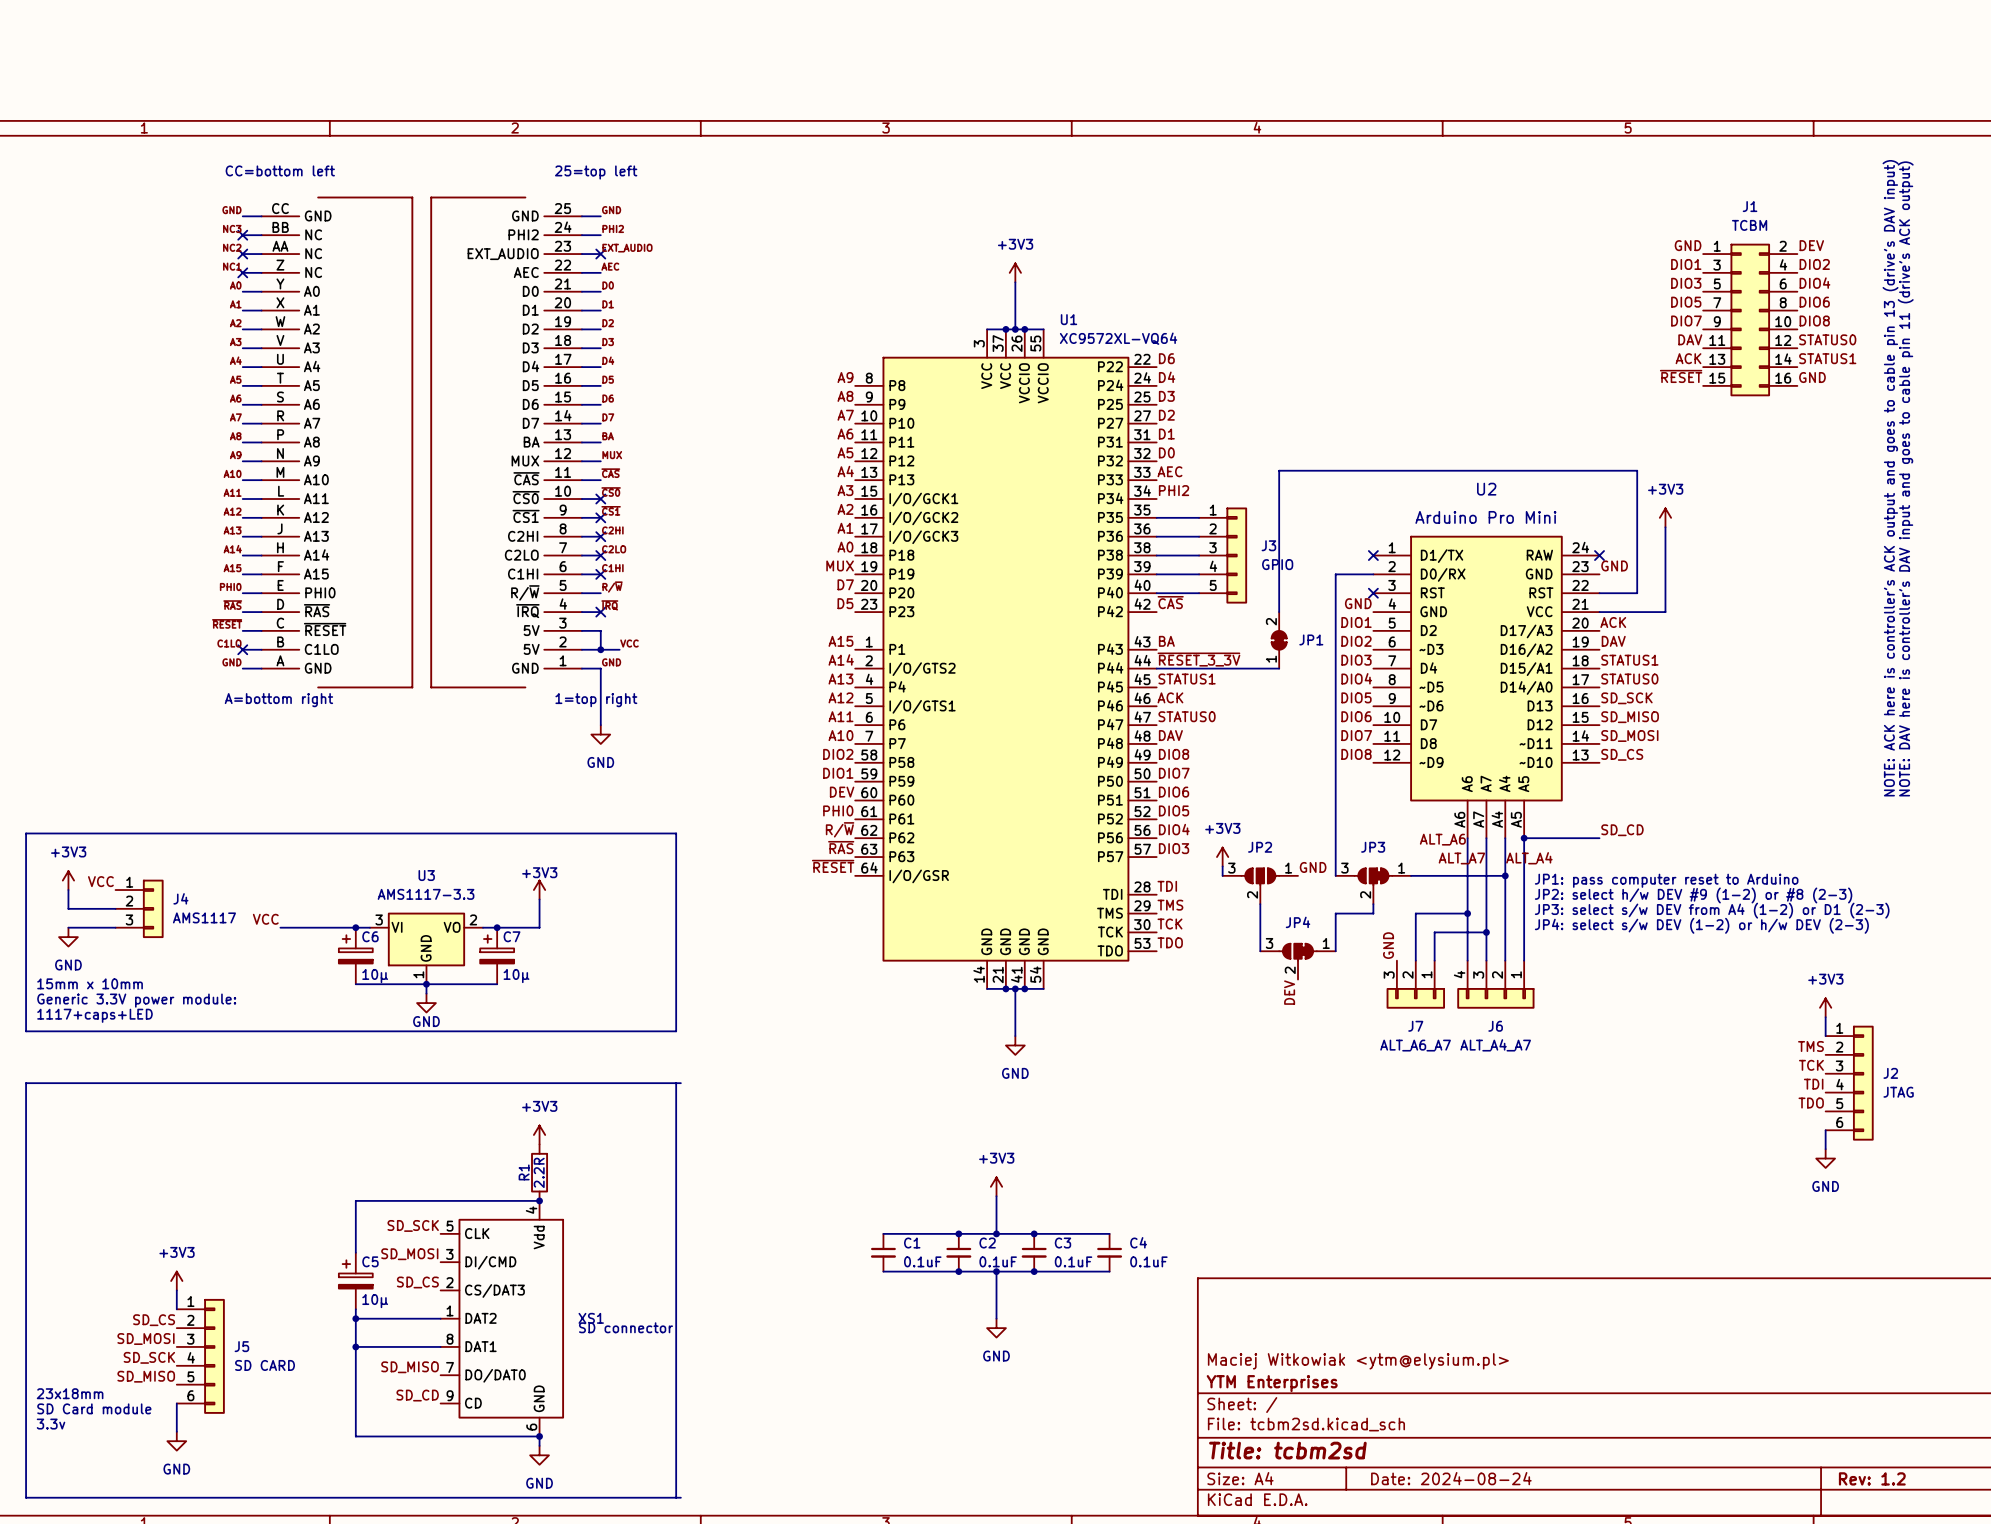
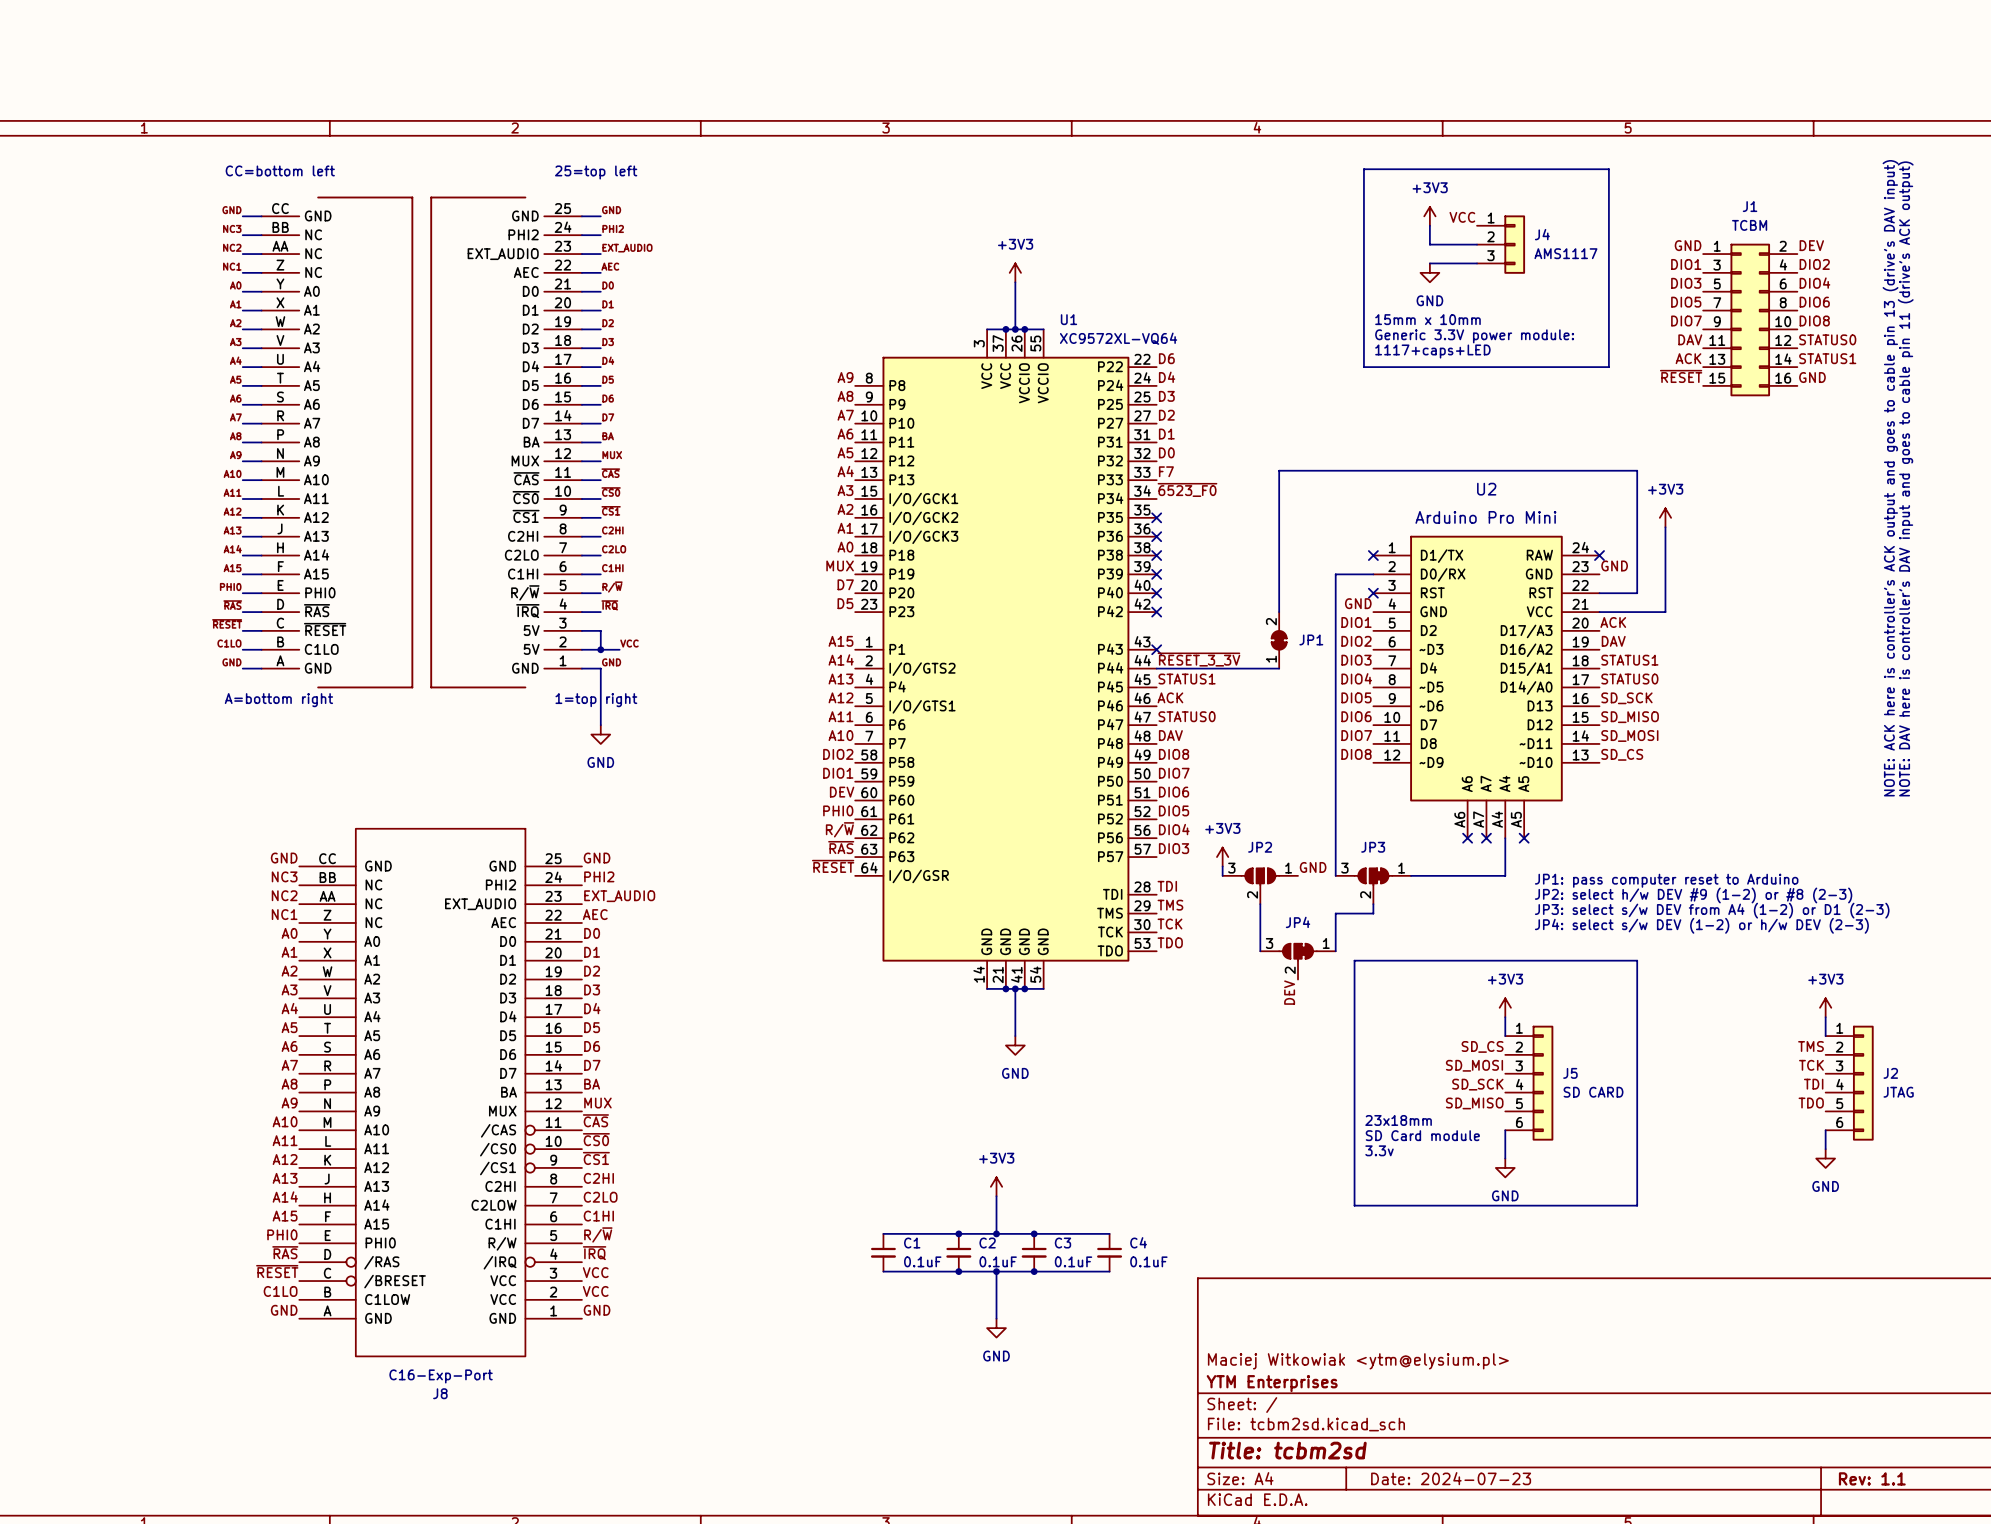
line: none -> (1363, 169) (1608, 169) (1608, 367) (1363, 367) (1363, 169)
power symbol: none -> +3V3 (1429, 216)
label: none -> VCC (1462, 217)
wire: none -> (1429, 225) (1429, 244) (1477, 244)
no-connect mark: (242, 235) -> none
no-connect mark: (242, 254) -> none
no-connect mark: (600, 254) -> none
wire: none -> (1429, 263) (1477, 263)
no-connect mark: (242, 272) -> none
power symbol: none -> GND (1429, 272)
text: none -> 15mm x 10mm (1427, 319)
text: none -> Generic 3.3V power module: (1474, 336)
text: none -> 1117+caps+LED (1432, 351)
label: AEC (1169, 471) -> F7 (1166, 471)
label: PHI2 (1174, 490) -> ~{6523_F0} (1187, 489)
no-connect mark: (600, 499) -> none
no-connect mark: (600, 517) -> none
wire: (1156, 517) (1199, 517) -> none
no-connect mark: none -> (1156, 517)
no-connect mark: (600, 536) -> none
wire: (1156, 536) (1199, 536) -> none
no-connect mark: none -> (1156, 536)
no-connect mark: (600, 555) -> none
wire: (1156, 555) (1199, 555) -> none
no-connect mark: none -> (1156, 555)
J3: GPIO (1223, 555) -> none
no-connect mark: (600, 574) -> none
wire: (1156, 574) (1199, 574) -> none
no-connect mark: none -> (1156, 574)
wire: (1156, 593) (1199, 593) -> none
no-connect mark: none -> (1156, 593)
label: ~{CAS} (1170, 602) -> none
no-connect mark: (600, 612) -> none
no-connect mark: none -> (1156, 612)
label: BA (1166, 641) -> none
no-connect mark: (242, 649) -> none
no-connect mark: none -> (1156, 649)
label: SD_CD (1622, 830) -> none
line: (26, 833) (676, 833) (676, 1031) (26, 1031) (26, 833) -> none
wire: (1467, 838) (1467, 960) -> none
no-connect mark: none -> (1467, 838)
wire: (1486, 838) (1486, 960) -> none
no-connect mark: none -> (1486, 838)
junction: (1524, 838) -> none
no-connect mark: none -> (1524, 838)
wire: (1599, 838) (1524, 838) (1524, 960) -> none
label: ALT_A6 (1442, 839) -> none
label: none -> GND (284, 858)
label: none -> GND (597, 858)
label: ALT_A7 (1461, 858) -> none
label: ALT_A4 (1529, 858) -> none
wire: (1505, 875) (1505, 960) -> none
junction: (1505, 875) -> none
label: none -> NC3 (284, 876)
label: none -> PHI2 (599, 876)
power symbol: +3V3 (68, 880) -> none
label: VCC (100, 881) -> none
wire: (68, 890) (68, 908) (115, 908) -> none
power symbol: +3V3 (539, 890) -> none
label: none -> NC2 (284, 895)
label: none -> EXT_AUDIO (619, 896)
wire: (539, 899) (539, 927) (483, 927) -> none
J4 position: (139, 908) -> (1501, 244)
wire: (1467, 913) (1415, 913) (1415, 960) -> none
junction: (1467, 913) -> none
label: none -> NC1 (284, 914)
label: none -> AEC (595, 914)
label: VCC (265, 919) -> none
wire: (68, 927) (115, 927) -> none
wire: (280, 927) (369, 927) -> none
junction: (355, 927) -> none
junction: (497, 927) -> none
wire: (1486, 932) (1434, 932) (1434, 960) -> none
junction: (1486, 932) -> none
label: none -> A0 (289, 933)
label: none -> D0 (592, 933)
power symbol: GND (68, 937) -> none
label: GND (1388, 945) -> none
U3: AMS1117-3.3 (426, 948) -> none
label: none -> A1 (289, 952)
label: none -> D1 (592, 952)
C6: 10µ (355, 955) -> none
C7: 10µ (497, 955) -> none
line: none -> (1354, 960) (1354, 1205) (1637, 1205) (1637, 960) (1354, 960)
label: none -> A2 (289, 971)
label: none -> D2 (592, 971)
text: 15mm x 10mm (90, 983) -> none
wire: (355, 984) (497, 984) -> none
wire: (426, 984) (426, 993) -> none
junction: (426, 984) -> none
J7: ALT_A6_A7 (1415, 984) -> none
J6: ALT_A4_A7 (1495, 984) -> none
label: none -> A3 (289, 989)
label: none -> D3 (592, 989)
text: Generic 3.3V power module: (136, 1000) -> none
power symbol: GND (426, 1003) -> none
power symbol: none -> +3V3 (1505, 1007)
label: none -> A4 (289, 1008)
label: none -> D4 (592, 1008)
text: 1117+caps+LED (94, 1015) -> none
wire: none -> (1505, 1017) (1505, 1036)
label: none -> A5 (289, 1027)
label: none -> D5 (592, 1027)
label: none -> A6 (289, 1046)
label: none -> D6 (592, 1046)
label: none -> SD_CS (1482, 1046)
label: none -> A7 (289, 1065)
label: none -> D7 (592, 1065)
label: none -> SD_MOSI (1474, 1065)
line: (676, 1083) (676, 1497) -> none
line: (680, 1083) (26, 1083) (26, 1497) (680, 1497) -> none
label: none -> A8 (289, 1084)
label: none -> BA (592, 1084)
label: none -> SD_SCK (1477, 1084)
J8: none -> C16-Exp-Port (440, 1092)
label: none -> A9 (289, 1103)
label: none -> MUX (597, 1103)
label: none -> SD_MISO (1474, 1103)
label: none -> ~{CAS} (595, 1120)
text: none -> 23x18mm (1398, 1120)
label: none -> A10 (285, 1121)
wire: none -> (1505, 1130) (1505, 1158)
power symbol: +3V3 (539, 1134) -> none
text: none -> SD Card module (1422, 1135)
label: none -> ~{CS0} (596, 1139)
label: none -> A11 (285, 1140)
text: none -> 3.3v (1379, 1150)
label: none -> ~{CS1} (596, 1158)
label: none -> A12 (285, 1159)
power symbol: none -> GND (1505, 1167)
R1: 2.2R (539, 1172) -> none
label: none -> A13 (285, 1178)
label: none -> C2HI (598, 1178)
label: none -> A14 (285, 1197)
label: none -> C2LO (600, 1197)
wire: (539, 1200) (355, 1200) (355, 1252) -> none
junction: (539, 1200) -> none
label: none -> A15 (285, 1216)
label: none -> C1HI (598, 1216)
label: SD_SCK (413, 1225) -> none
label: none -> PHI0 (282, 1234)
label: none -> R/~{W} (598, 1234)
label: none -> ~{RAS} (285, 1252)
label: none -> ~{IRQ} (594, 1253)
label: SD_MOSI (409, 1254) -> none
label: none -> ~{RESET} (277, 1271)
label: none -> VCC (595, 1272)
power symbol: +3V3 (176, 1281) -> none
C5: 10µ (355, 1281) -> none
label: SD_CS (417, 1282) -> none
wire: (176, 1290) (176, 1309) -> none
label: none -> C1LO (280, 1291)
label: none -> VCC (595, 1291)
wire: (355, 1309) (355, 1436) (539, 1436) (539, 1445) -> none
label: none -> GND (284, 1310)
label: none -> GND (597, 1310)
wire: (355, 1318) (440, 1318) -> none
junction: (355, 1318) -> none
XS1: SD connector (502, 1318) -> none
label: SD_CS (154, 1320) -> none
label: SD_MOSI (145, 1339) -> none
wire: (355, 1346) (440, 1346) -> none
junction: (355, 1346) -> none
J5 position: (200, 1356) -> (1529, 1083)
label: SD_SCK (149, 1357) -> none
label: SD_MISO (410, 1367) -> none
label: SD_MISO (146, 1376) -> none
text: 23x18mm (70, 1393) -> none
label: SD_CD (417, 1395) -> none
wire: (176, 1403) (176, 1431) -> none
text: SD Card module (94, 1408) -> none
text: 3.3v (51, 1424) -> none
junction: (539, 1436) -> none
power symbol: GND (176, 1441) -> none
power symbol: GND (539, 1455) -> none
title block: Date: 2024-08-24 (1451, 1478) -> Date: 2024-07-23 (1451, 1478)
title block: Rev: 1.2 (1872, 1478) -> Rev: 1.1 (1872, 1478)

